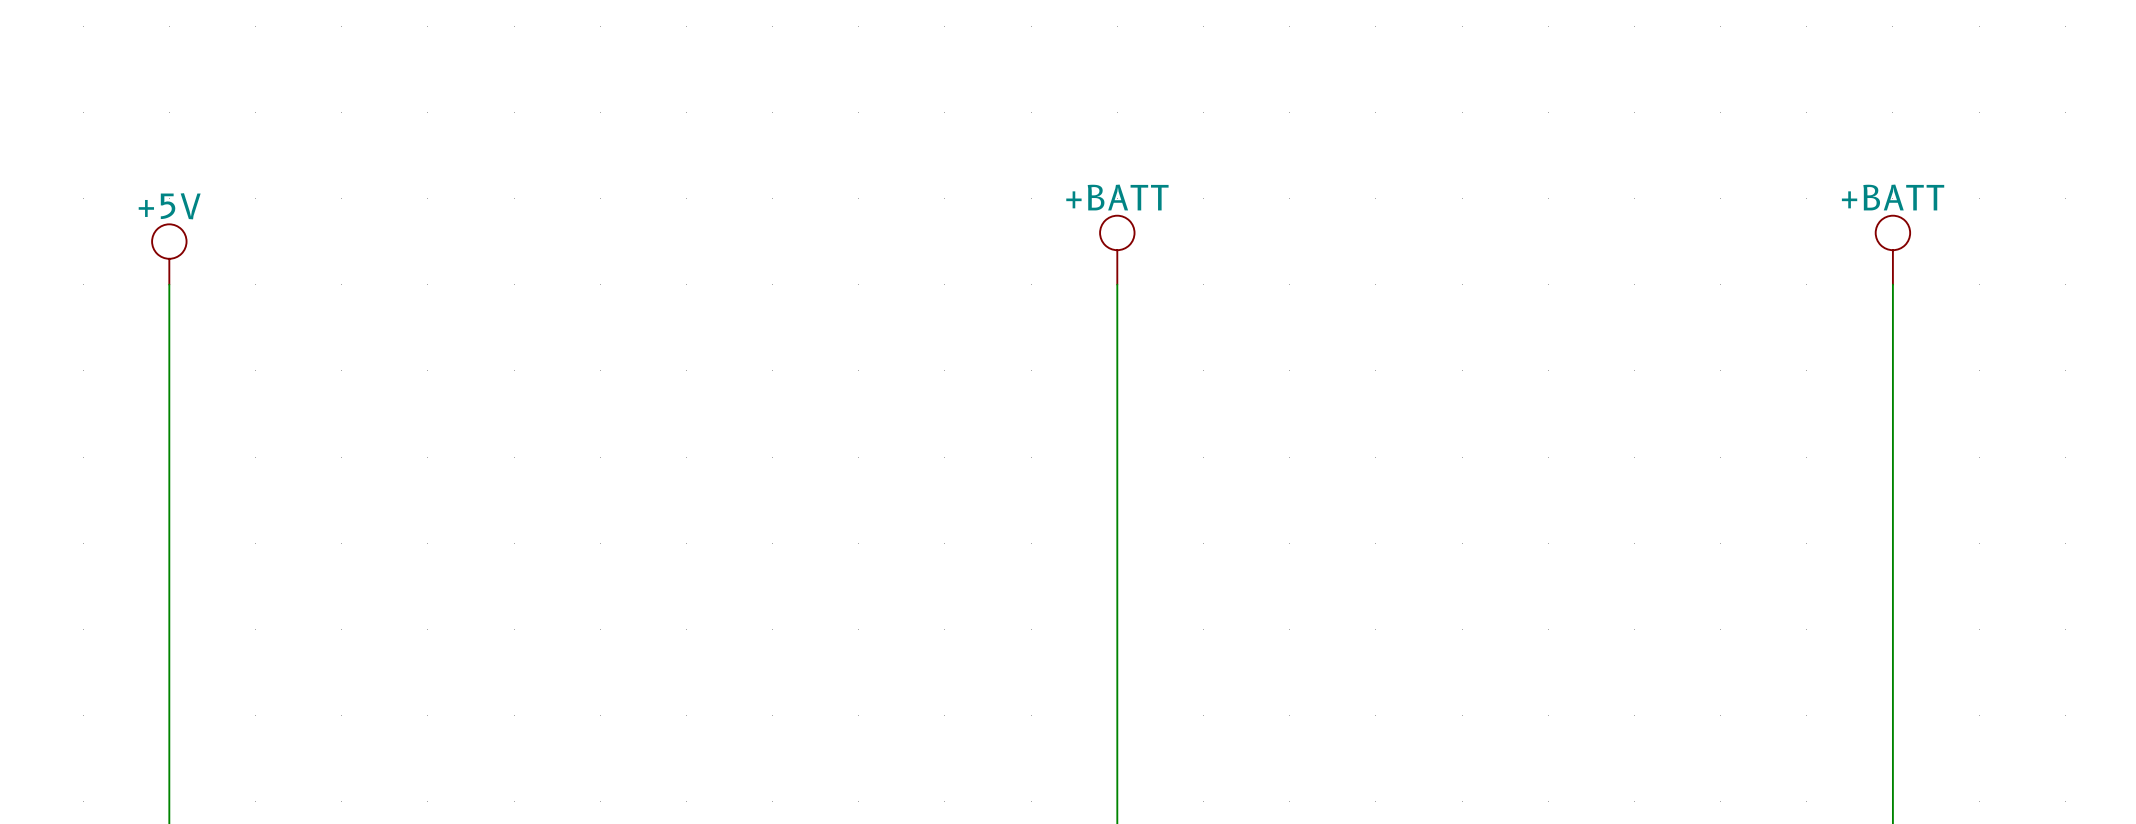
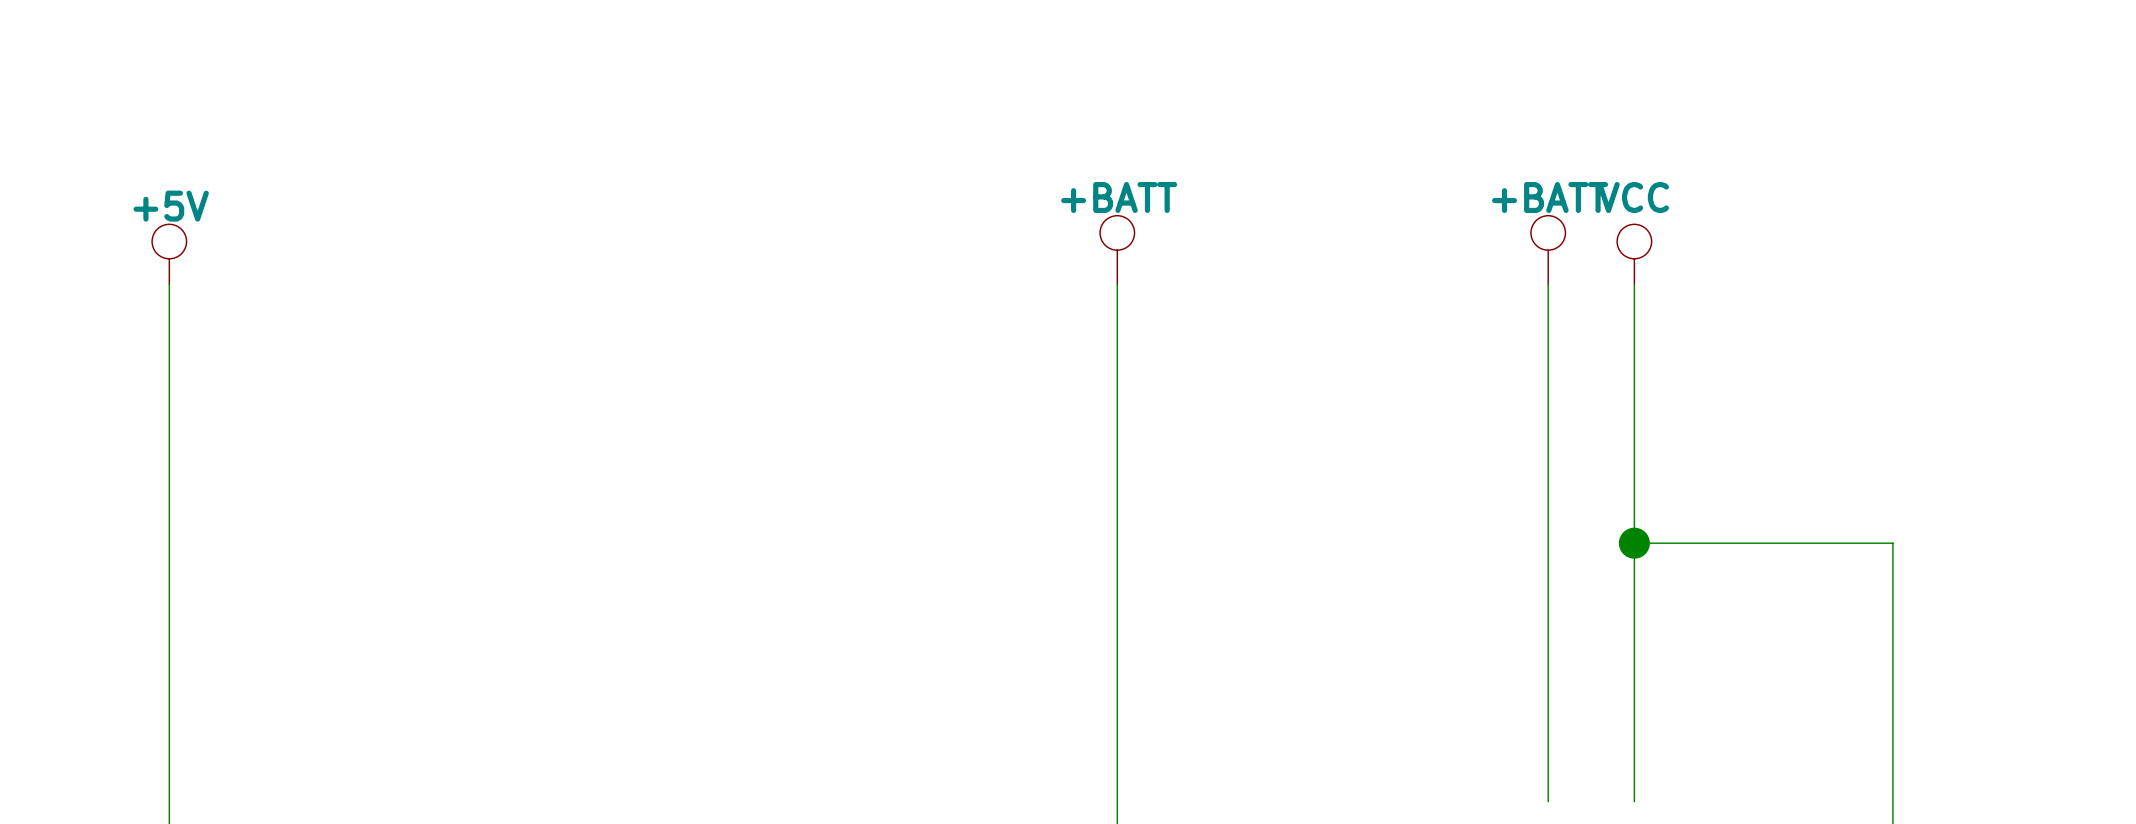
power symbol position: +BATT (1892, 250) -> +BATT (1548, 250)
power symbol: none -> VCC (1634, 254)
wire: none -> (1548, 284) (1548, 801)
wire: none -> (1634, 284) (1634, 801)
wire: (1892, 284) (1892, 543) -> (1634, 543) (1892, 543)
junction: none -> (1634, 543)

